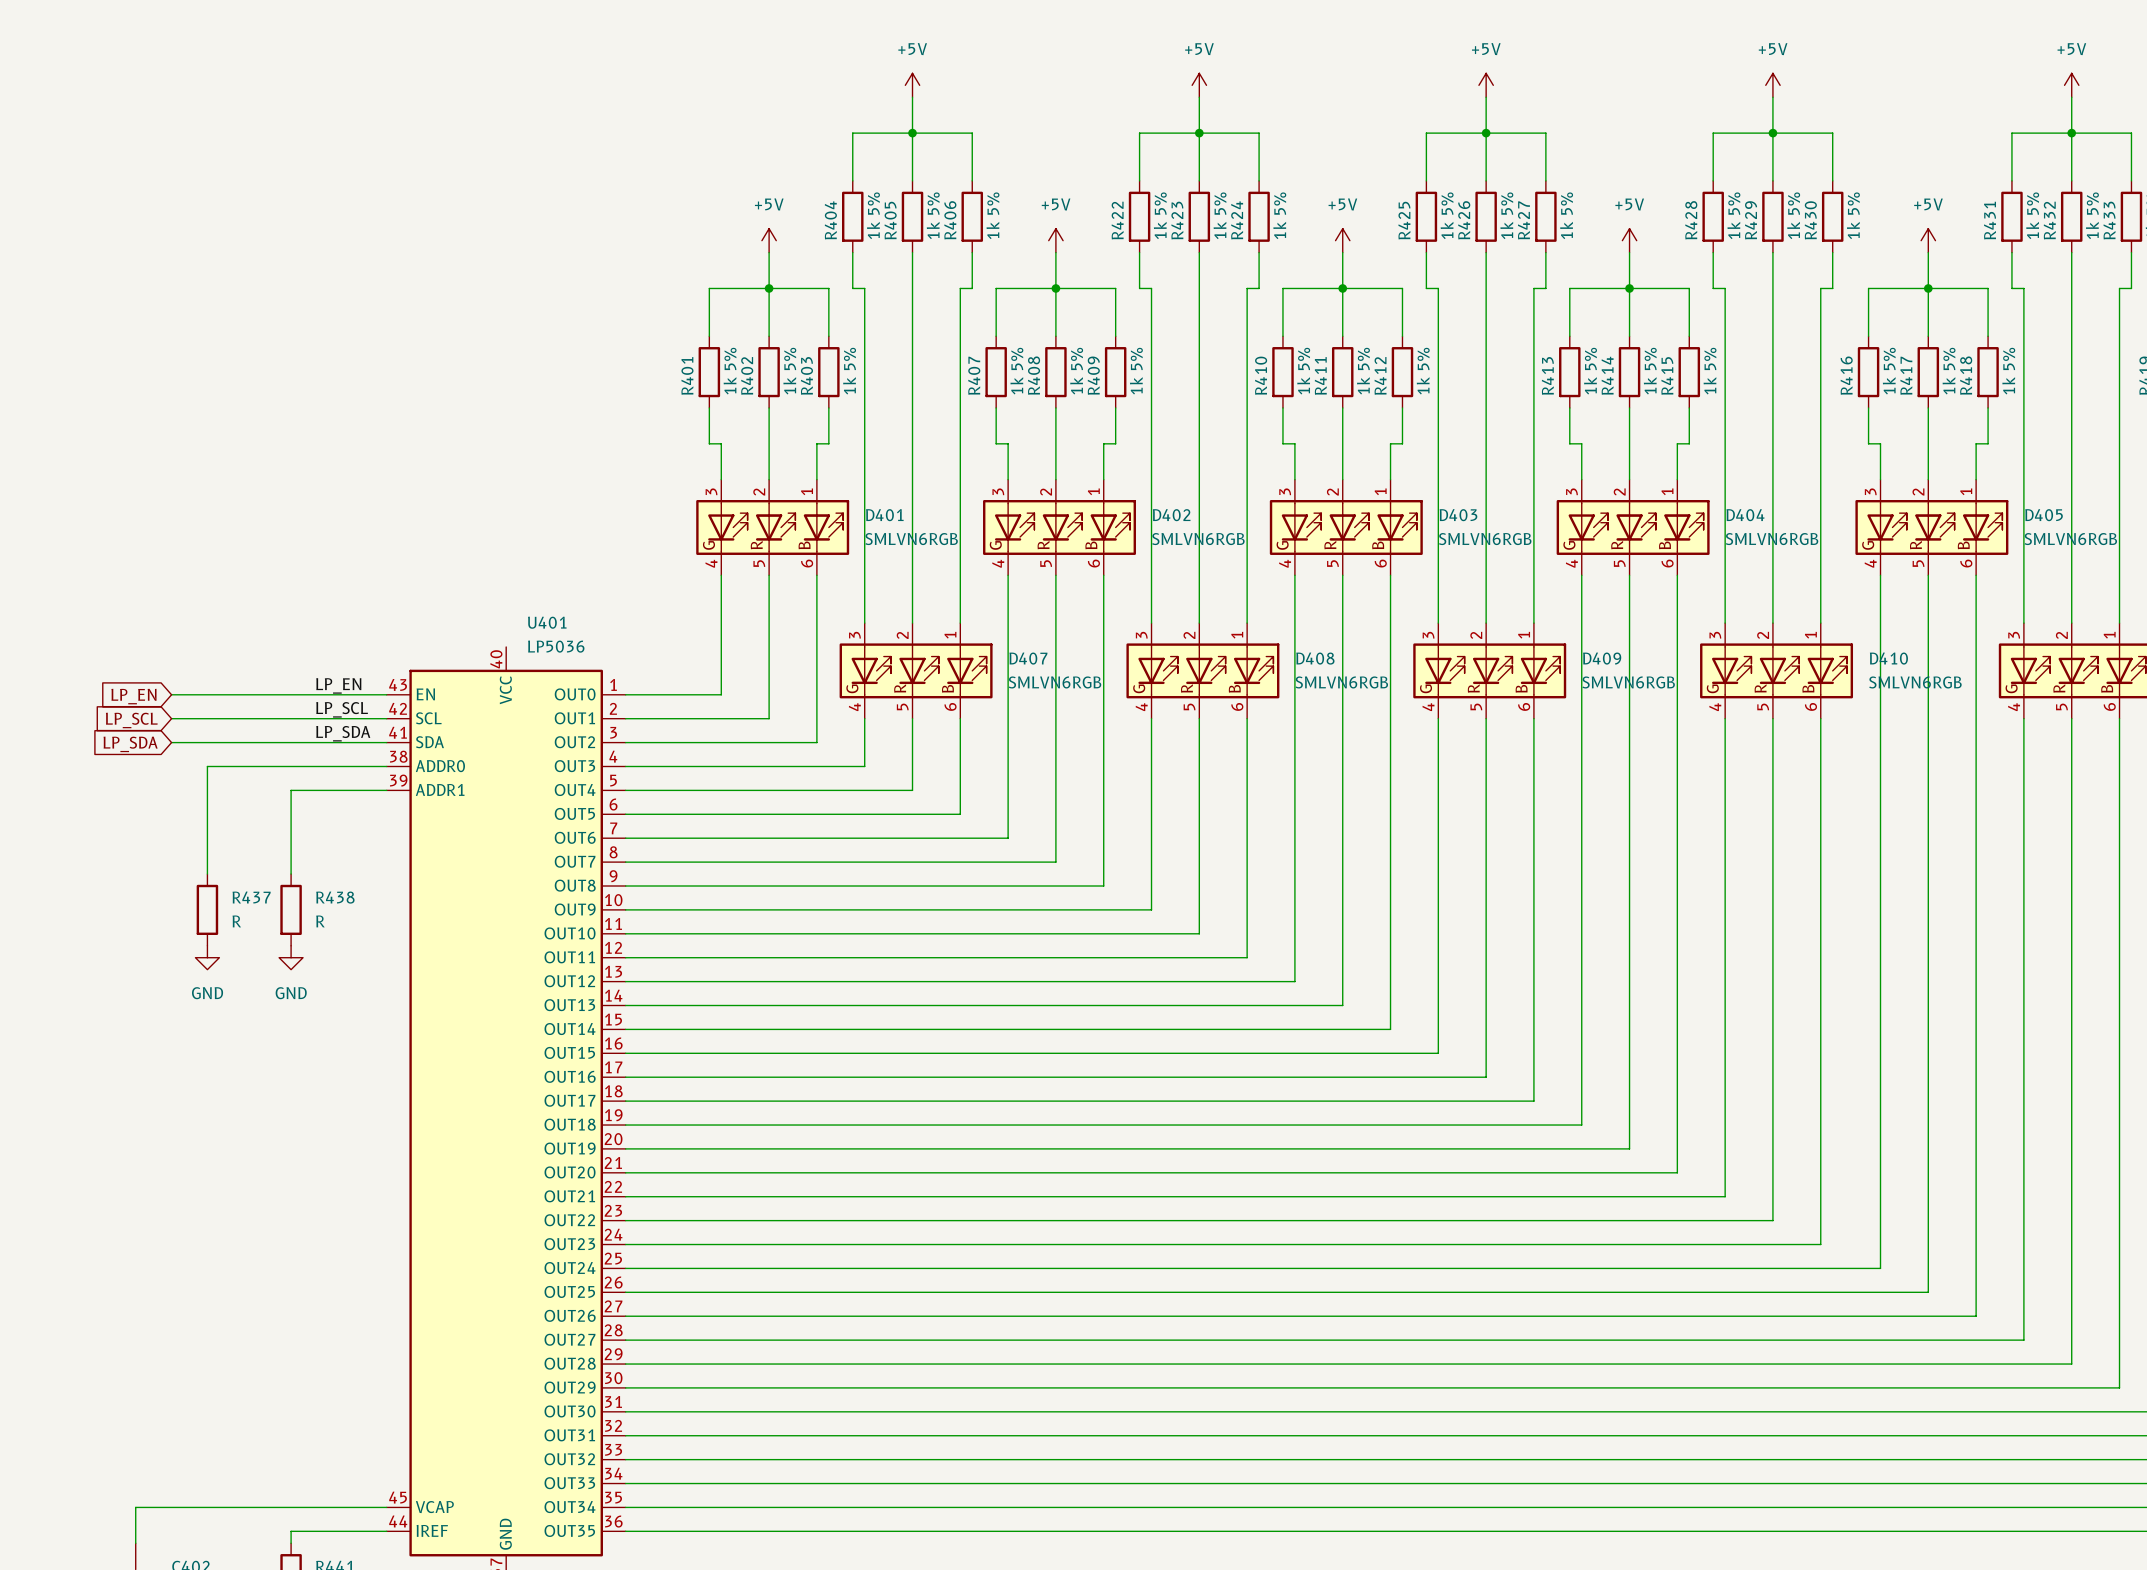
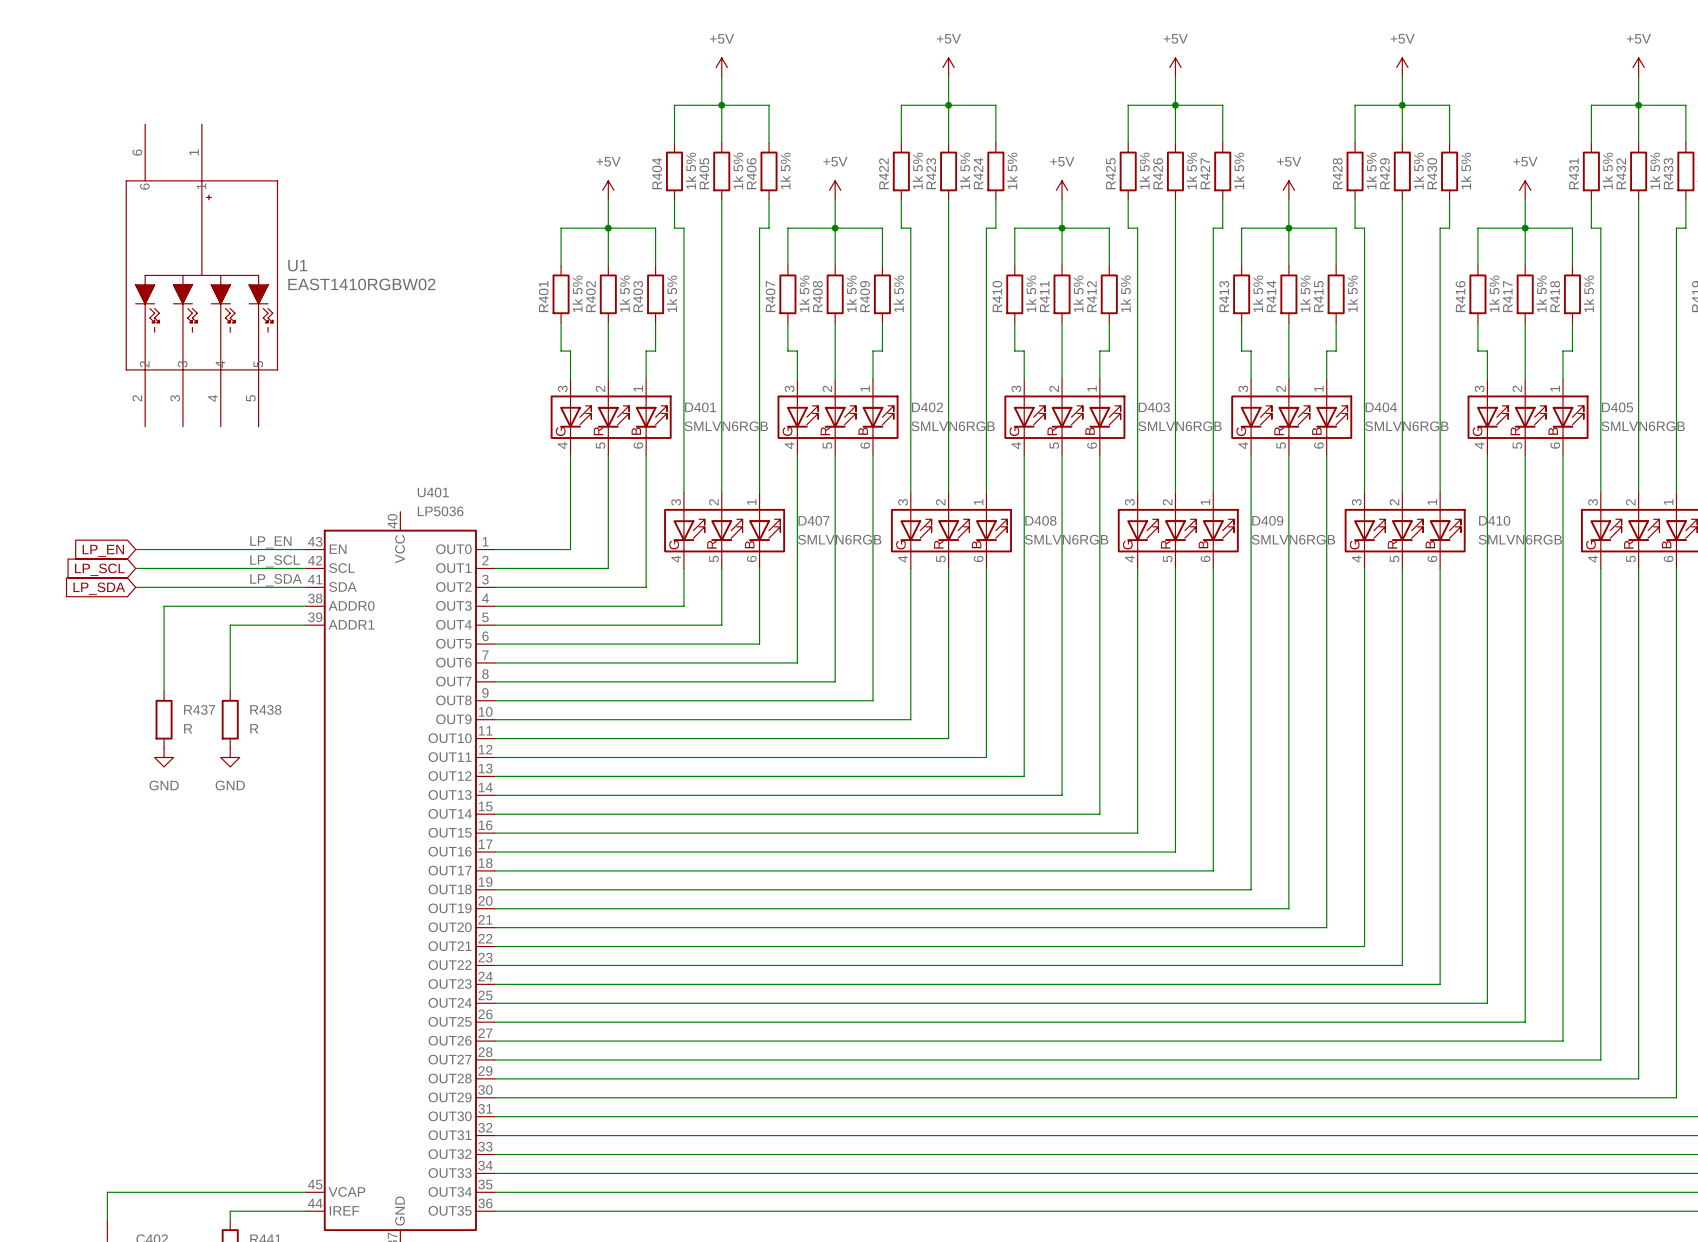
U1: none -> EAST1410RGBW02 (201, 275)

